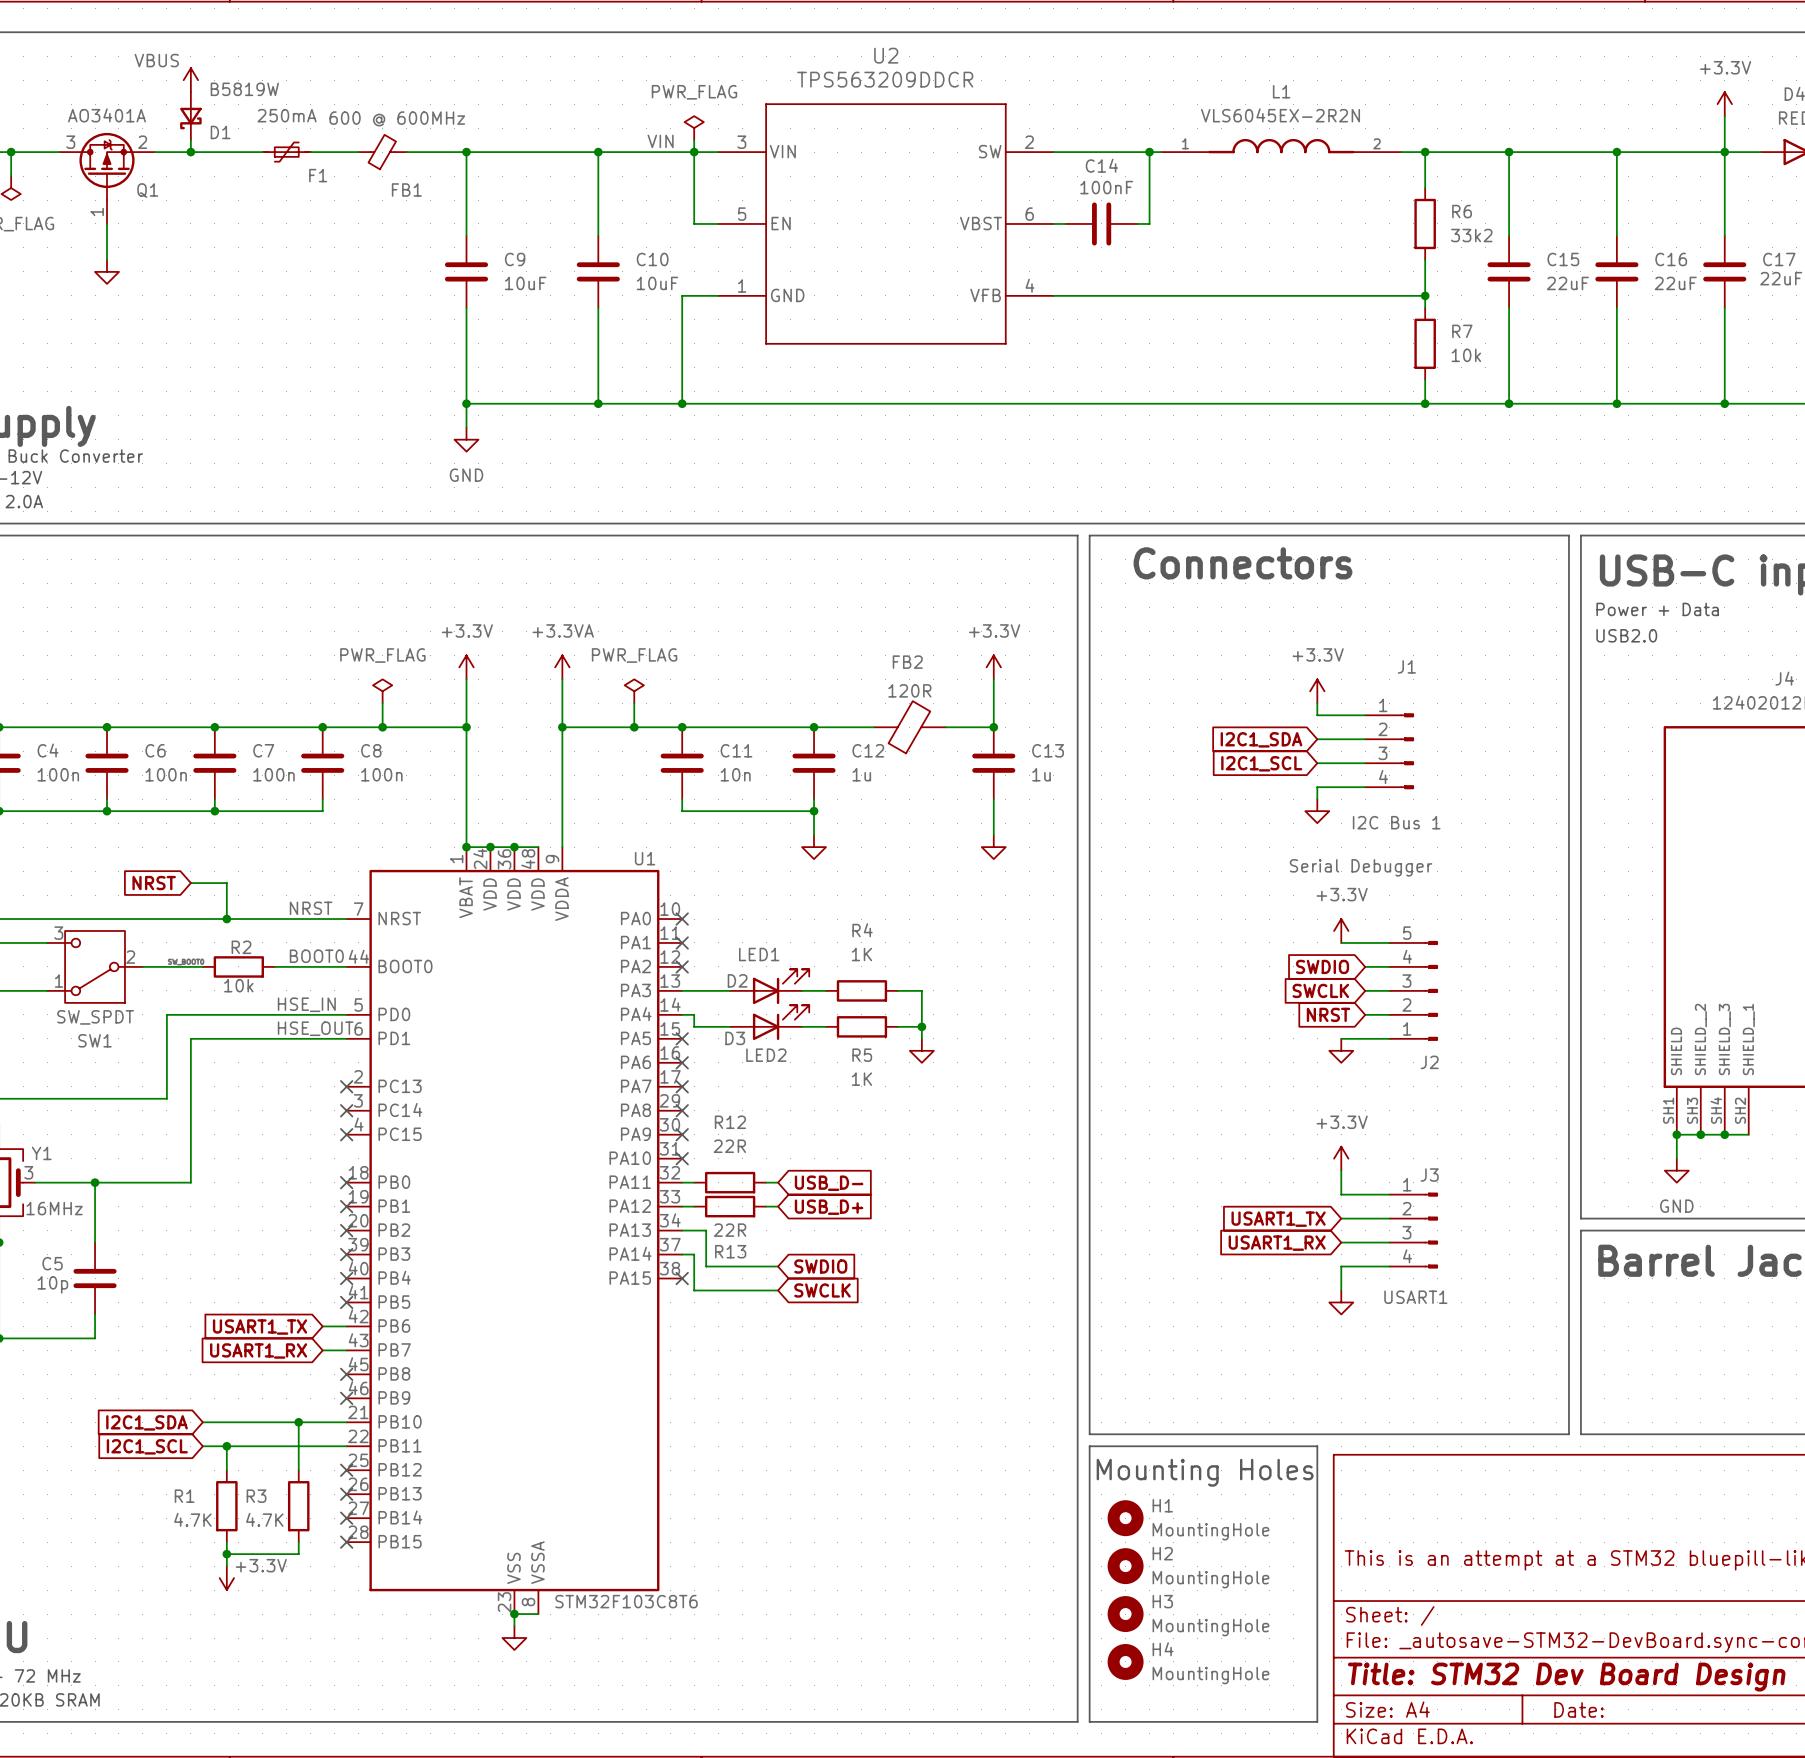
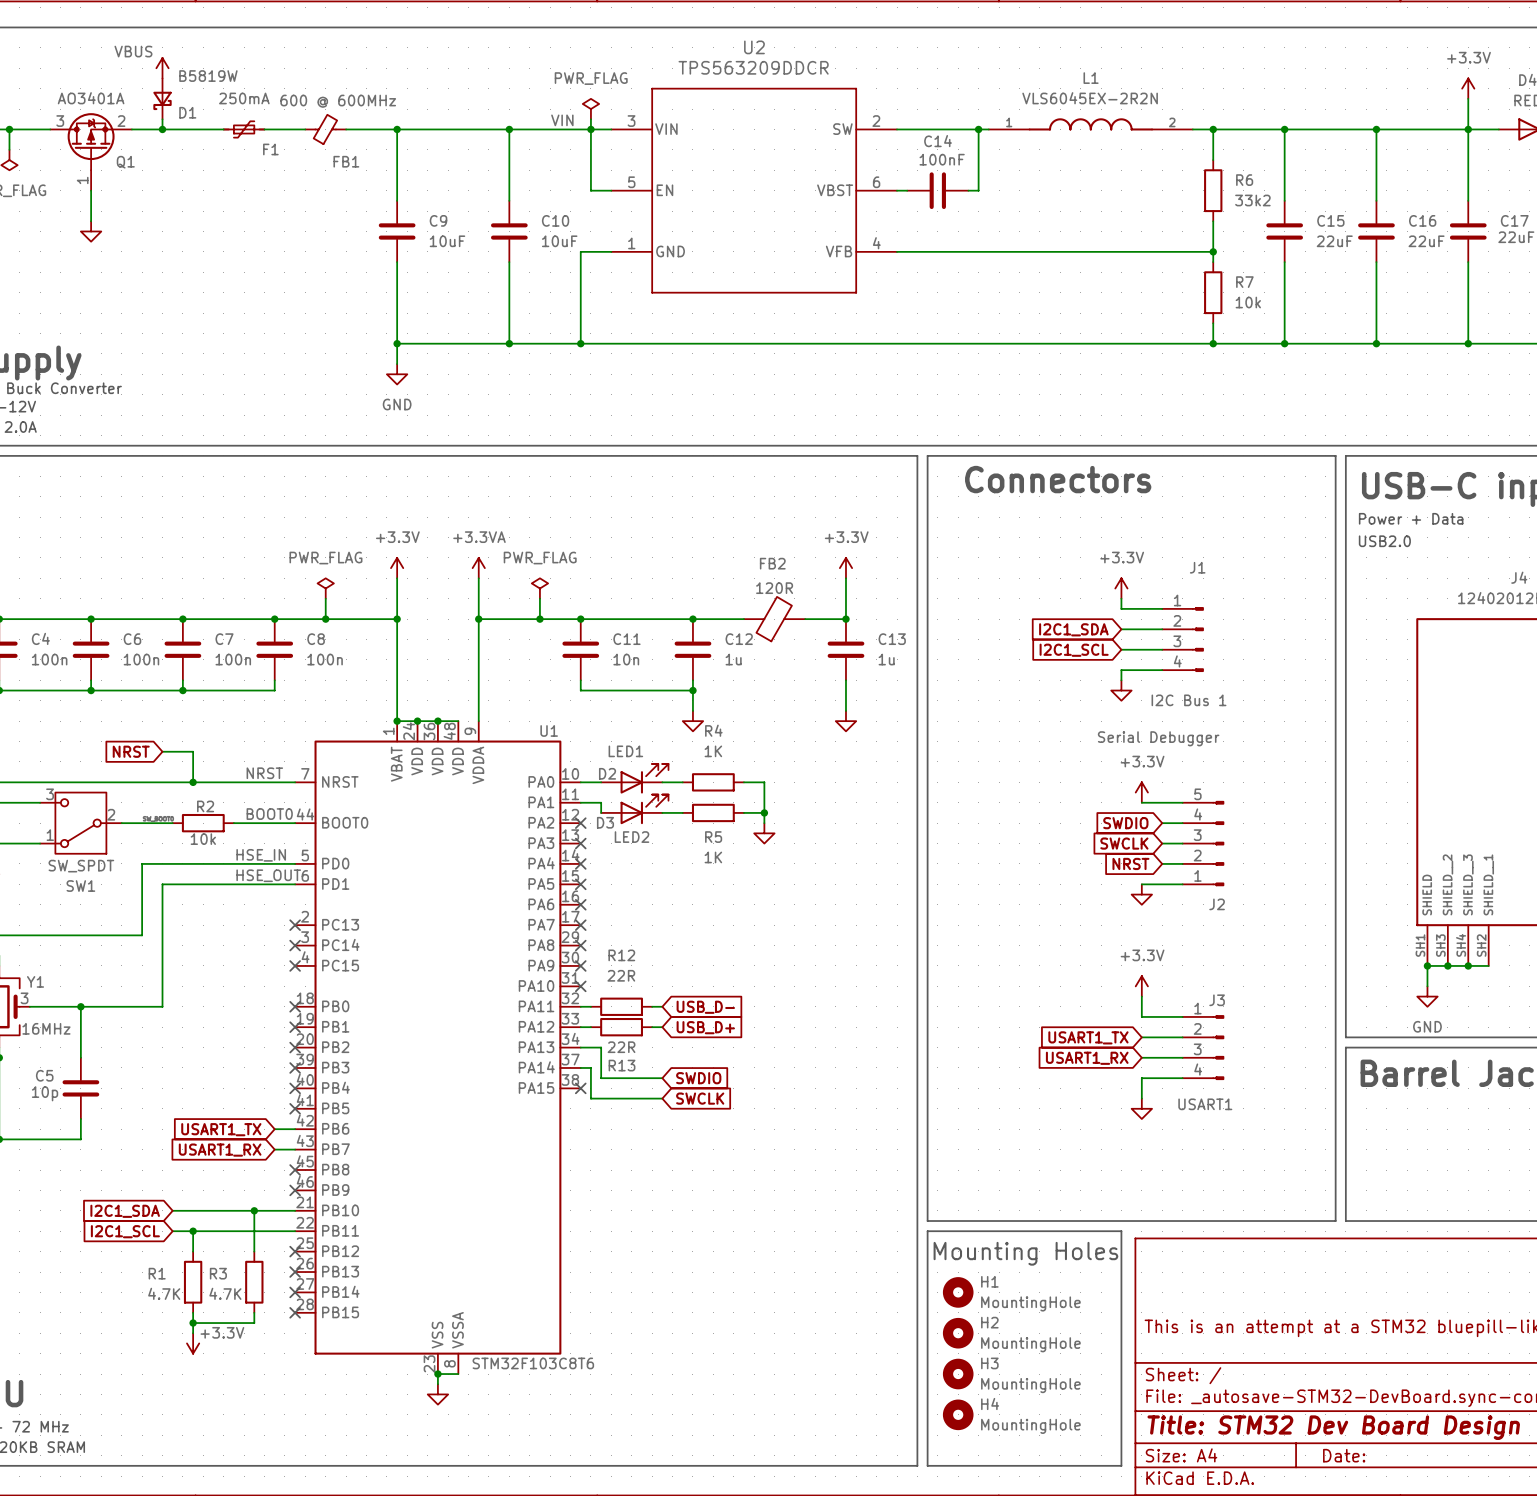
wire: none -> (580, 782) (601, 782)
no-connect mark: (682, 919) -> none
wire: none -> (580, 802) (601, 802) (601, 812)
no-connect mark: (682, 942) -> none
junction: none -> (764, 812)
D2 position: (769, 986) -> (634, 778)
wire: (682, 990) (730, 990) -> none
no-connect mark: none -> (580, 843)
wire: (802, 990) (826, 990) -> (662, 782) (682, 782)
R4 position: (861, 990) -> (713, 782)
wire: (897, 990) (921, 990) (921, 1038) -> (743, 782) (764, 782) (764, 823)
wire: (682, 1014) (694, 1014) (694, 1026) (730, 1026) -> none
no-connect mark: none -> (580, 863)
D3 position: (769, 1022) -> (634, 809)
wire: (802, 1026) (826, 1026) -> (662, 812) (682, 812)
R5 position: (861, 1026) -> (713, 812)
wire: (897, 1026) (921, 1026) -> (743, 812) (764, 812)
junction: (921, 1026) -> none
power symbol position: (921, 1050) -> (764, 833)

